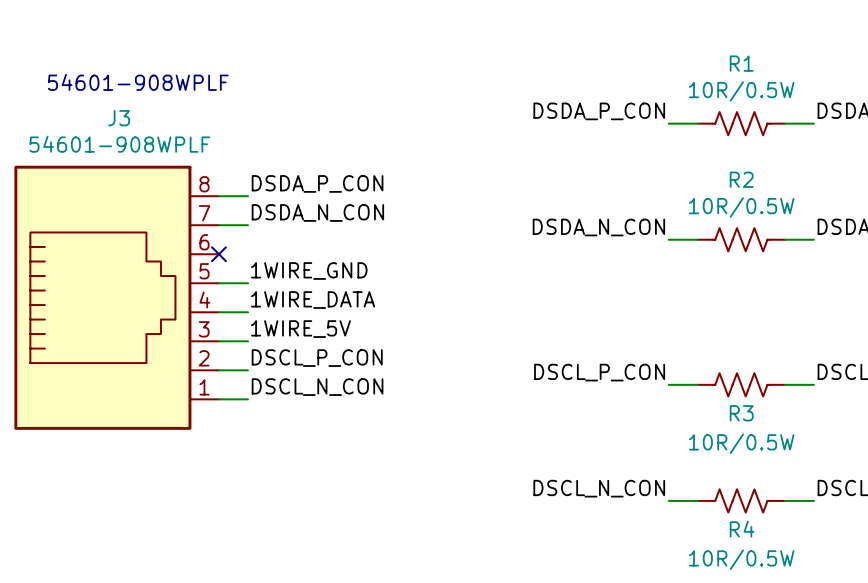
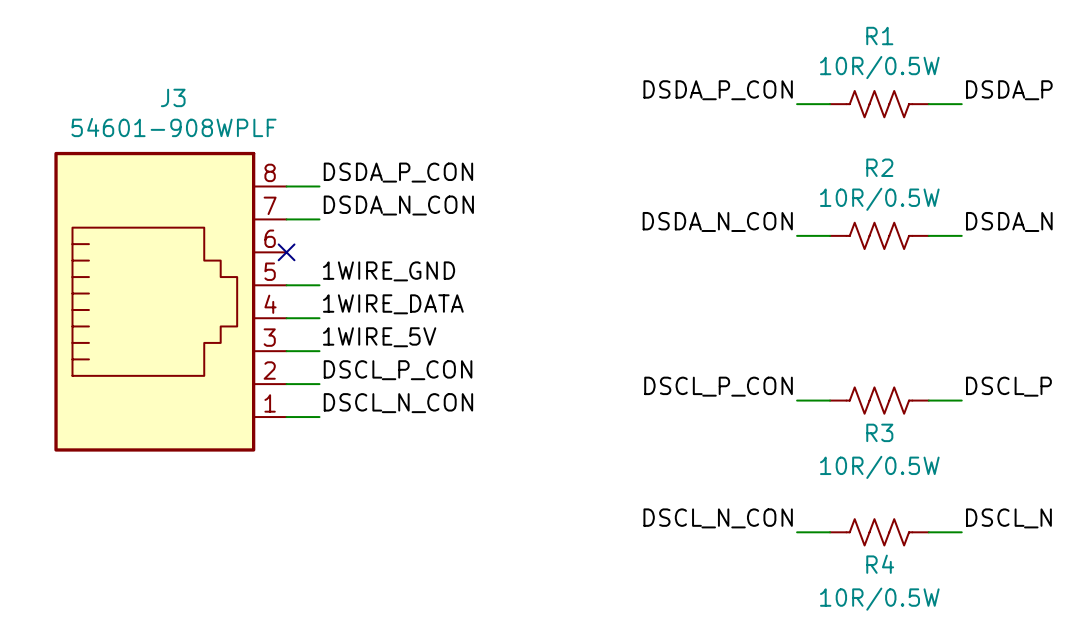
text: 54601-908WPLF (138, 82) -> none

